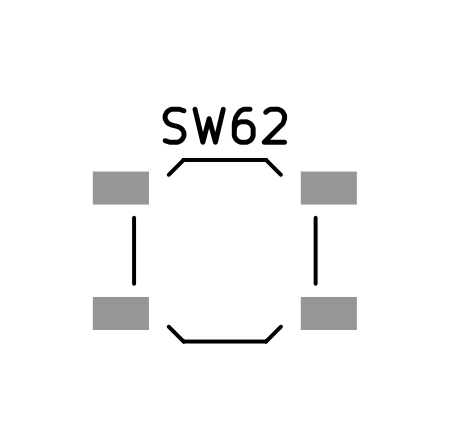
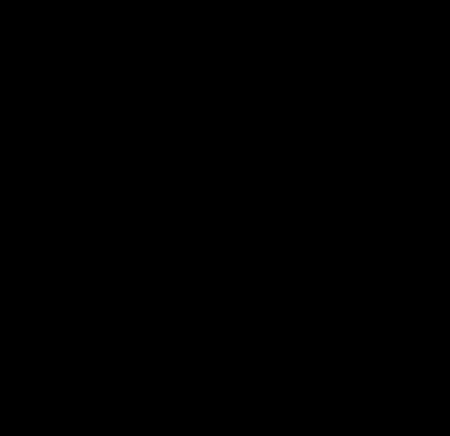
SW62: (224, 250) -> none

